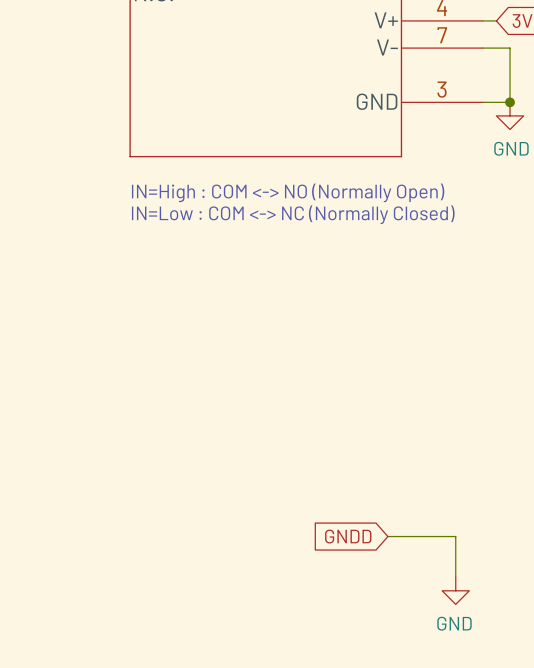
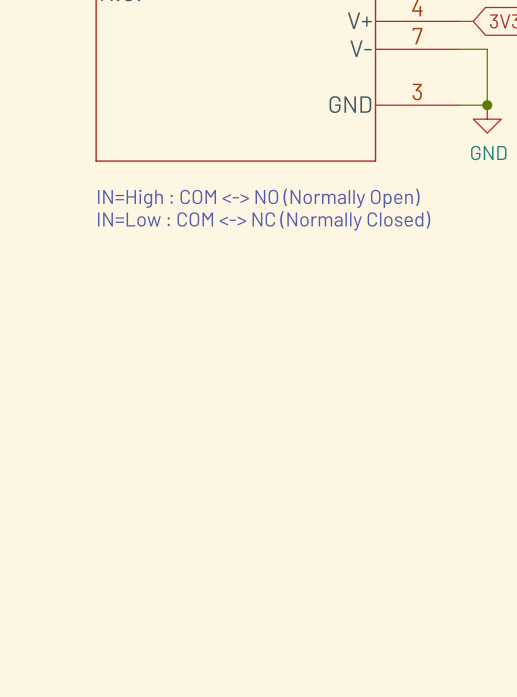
global label: GNDD (348, 536) -> none
wire: (387, 536) (455, 536) (455, 577) -> none
power symbol: GND (455, 590) -> none

